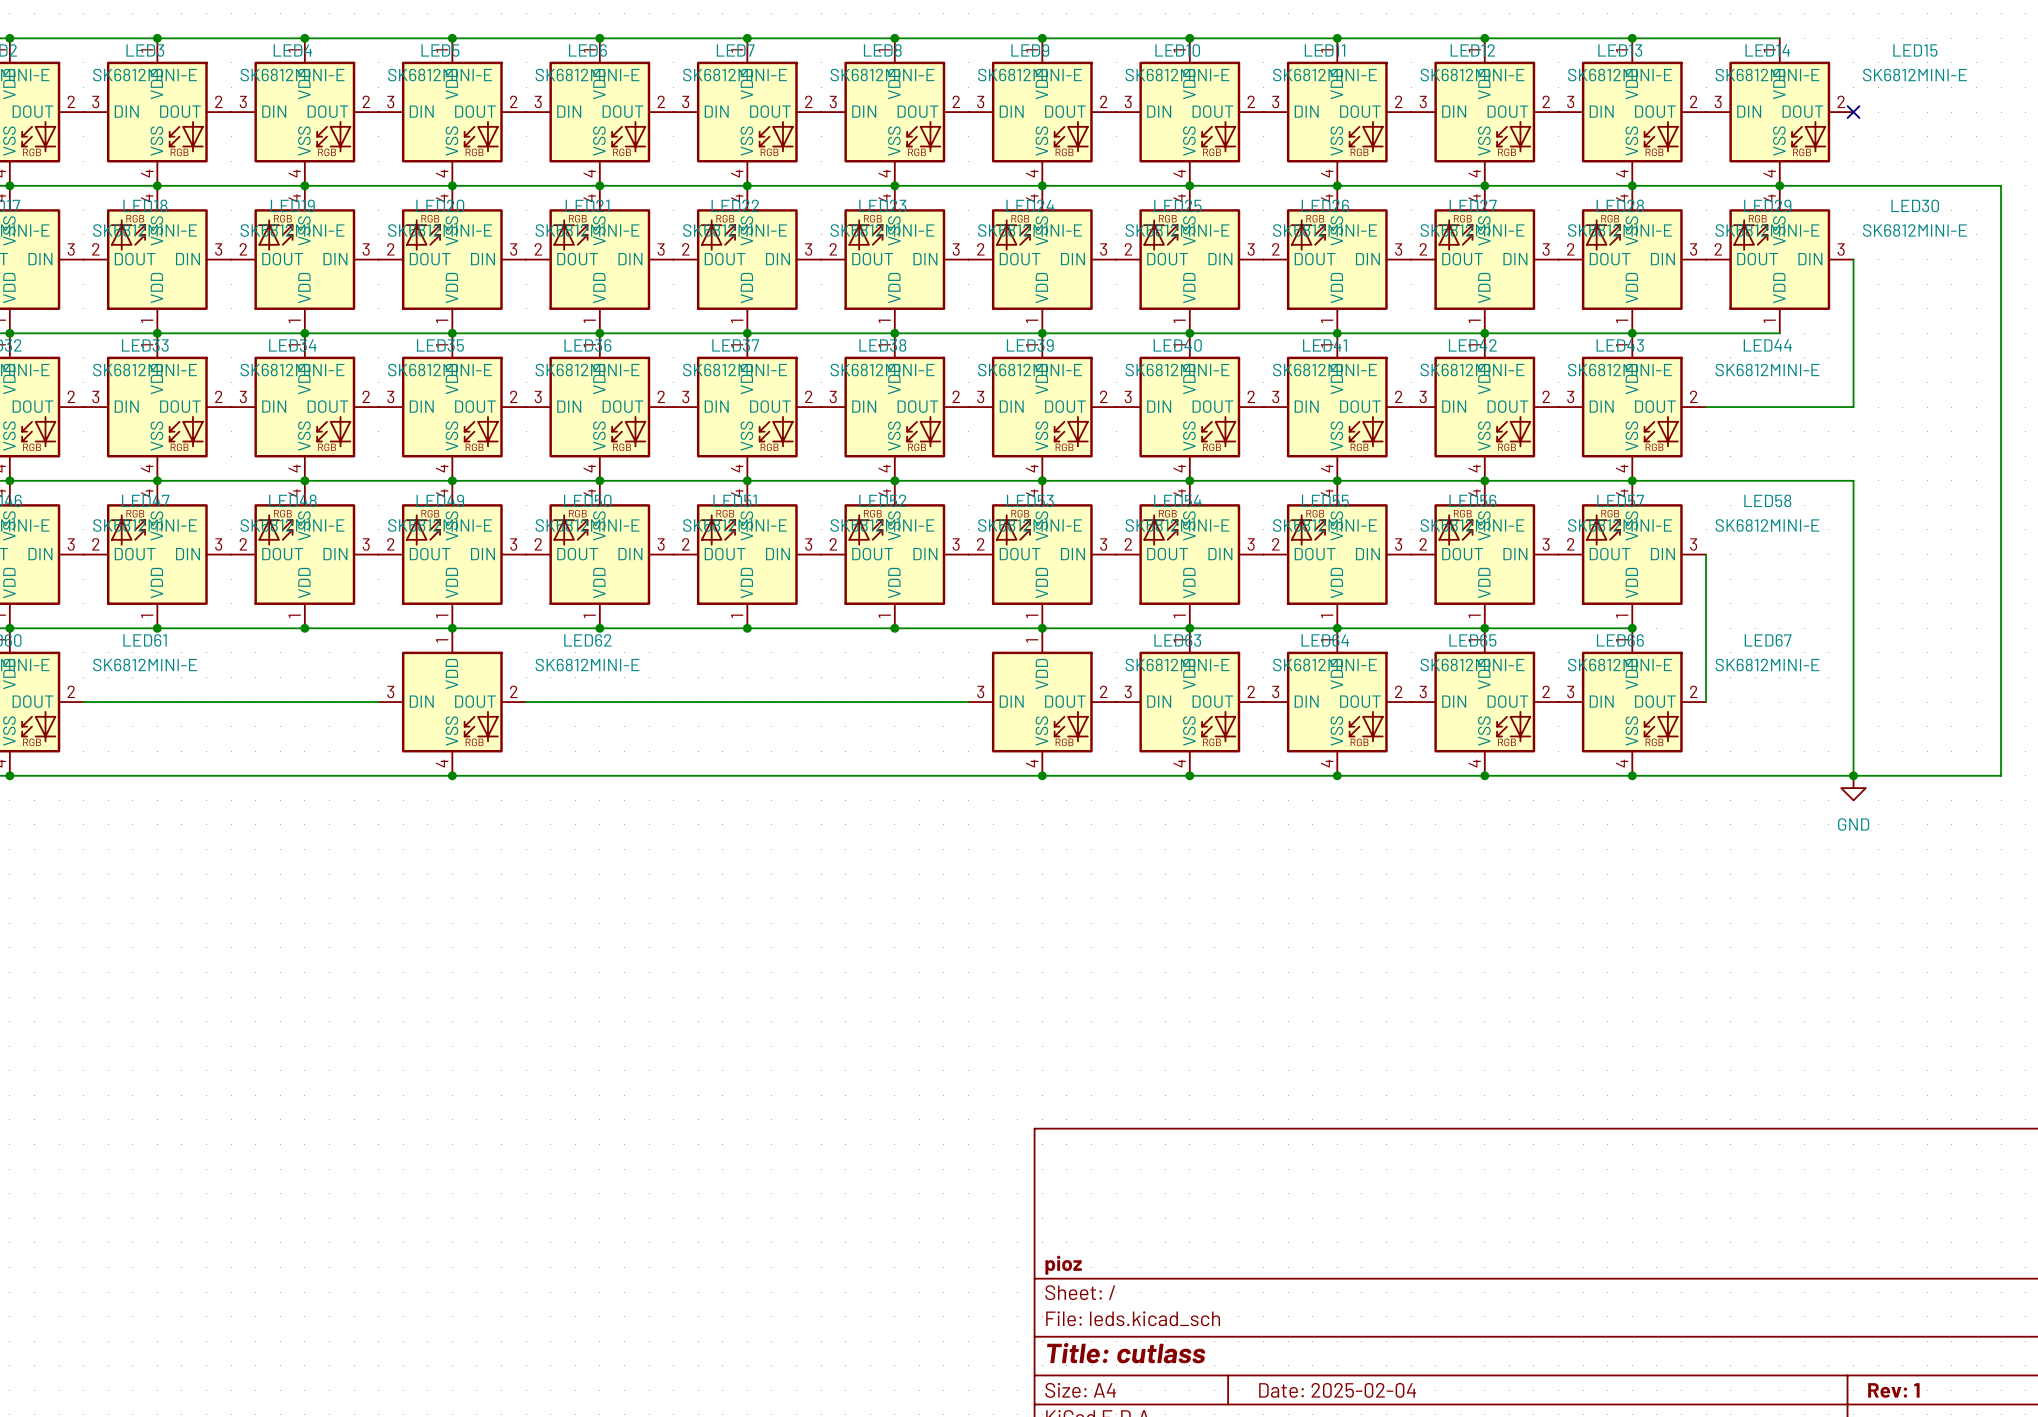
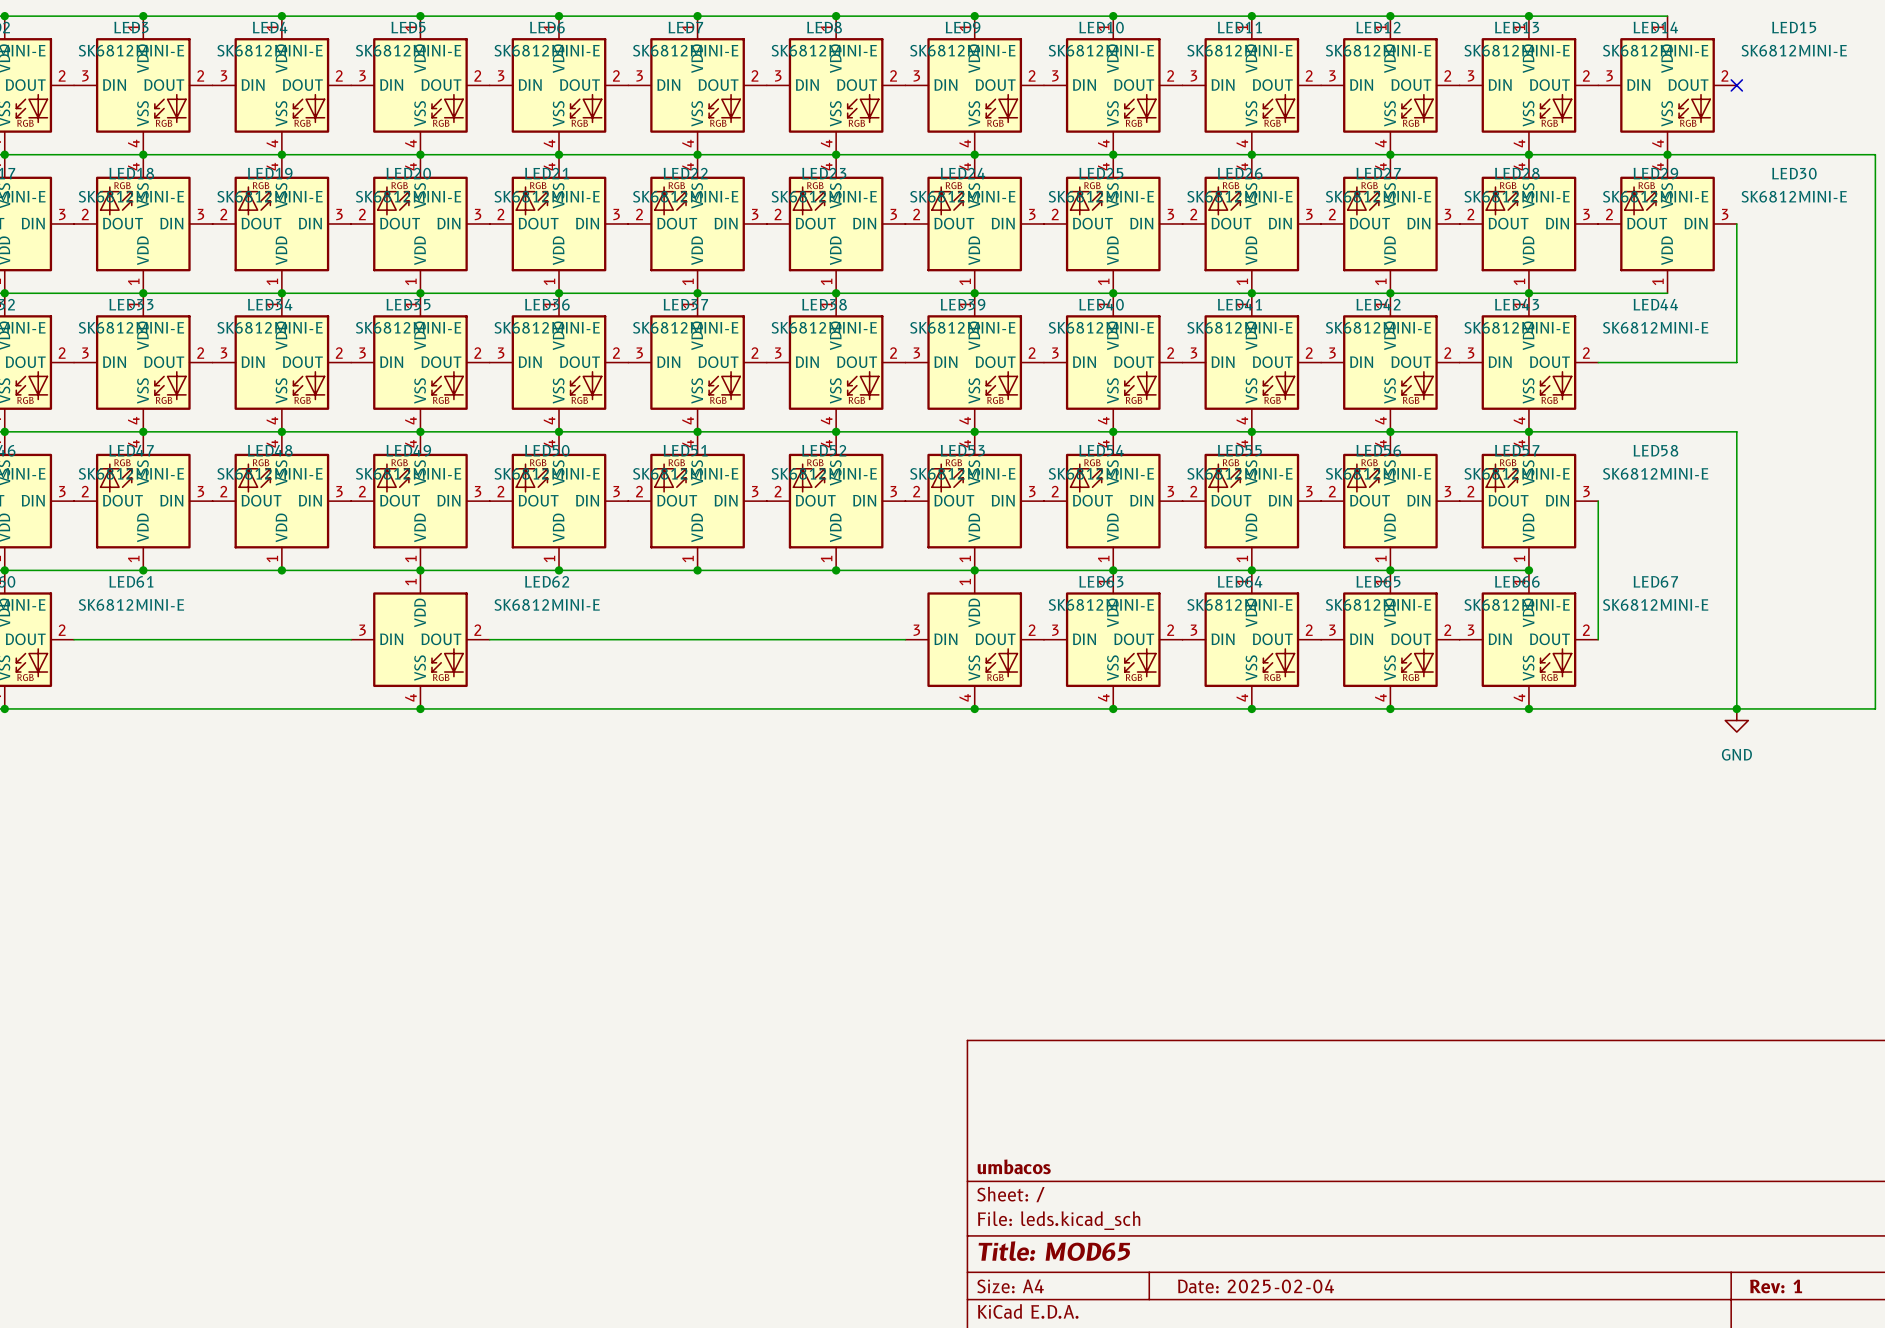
title block: pioz (1063, 1265) -> umbacos (1014, 1166)
title block: Title: cutlass (1126, 1353) -> Title: MOD65 (1054, 1251)

